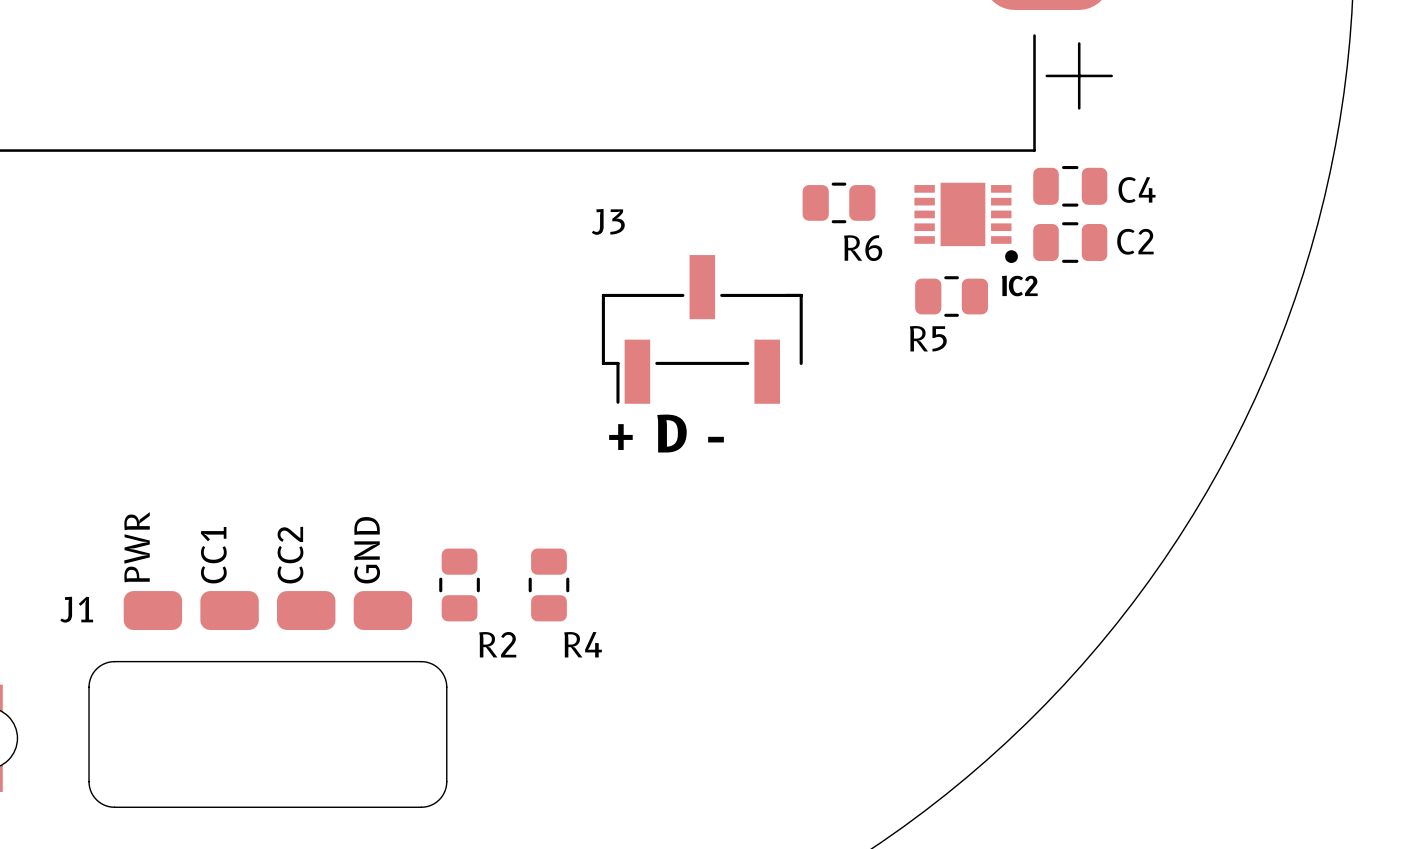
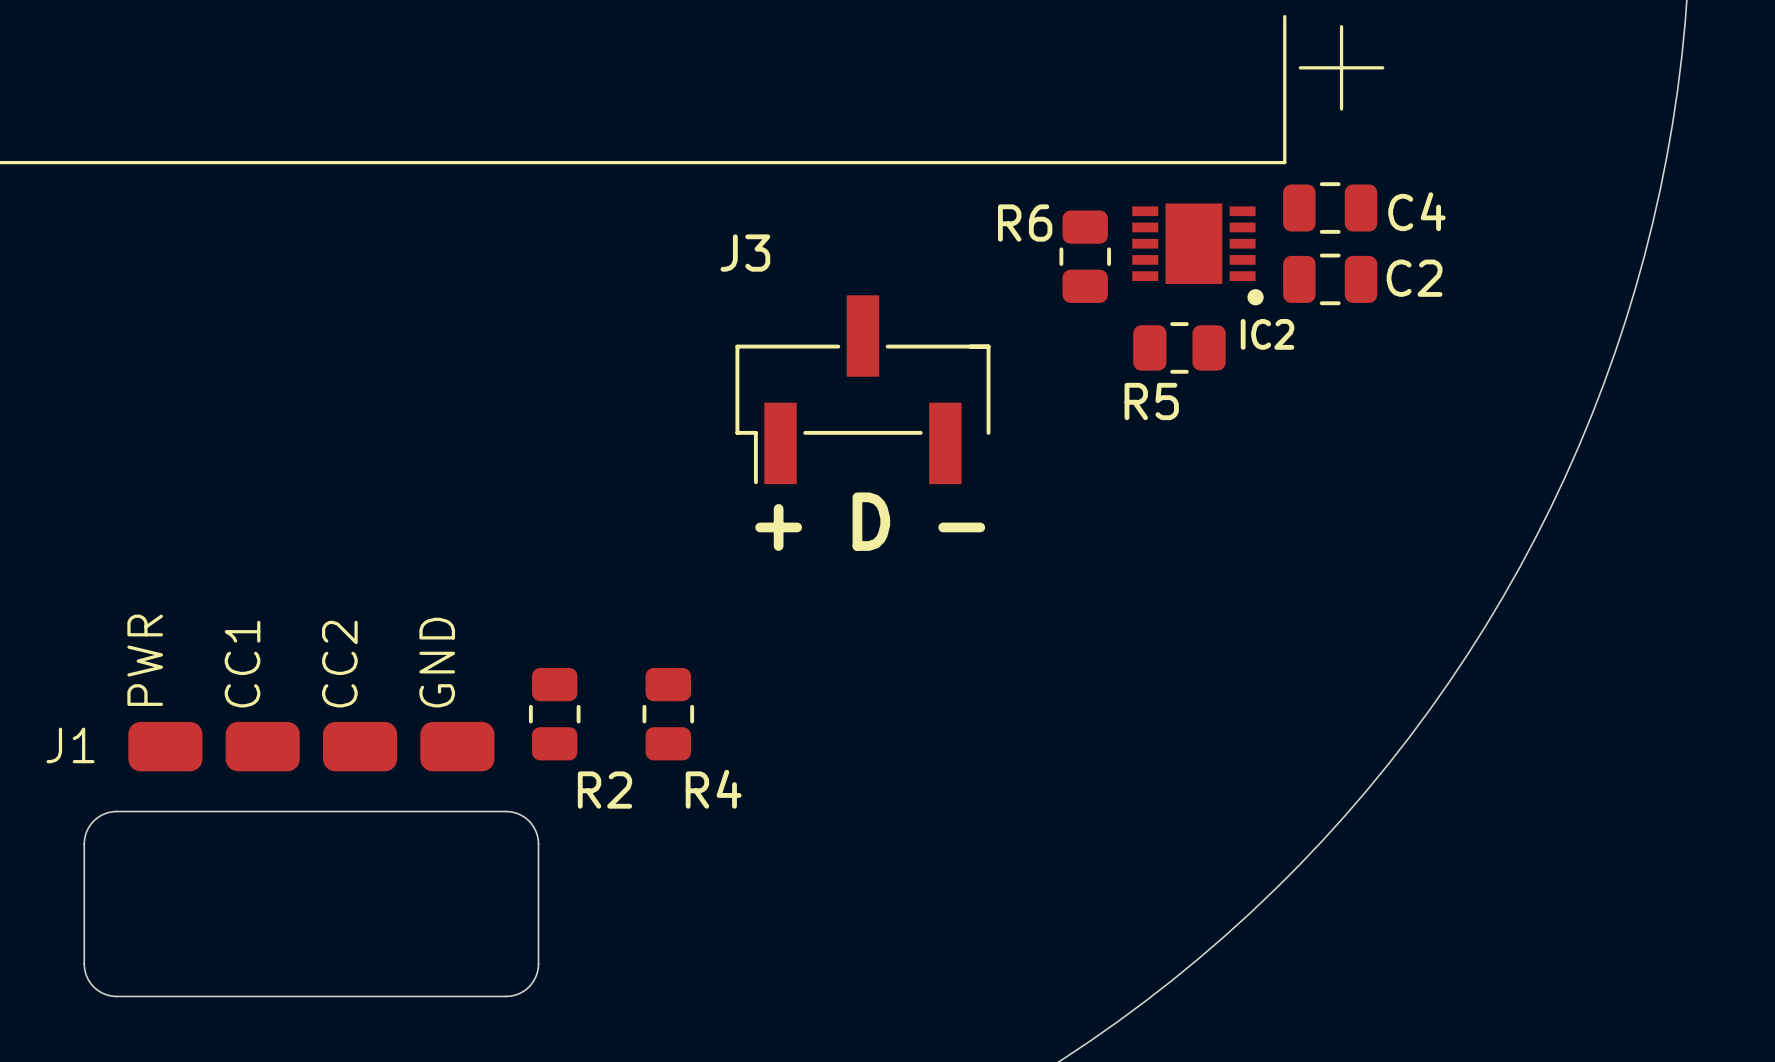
R6 rotation: 0° (839, 202) -> 90° clockwise (1085, 256)
R6 position: (839, 202) -> (1085, 256)

